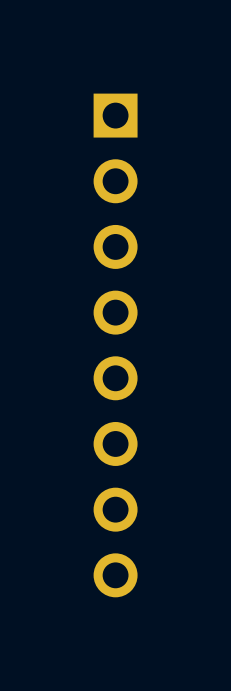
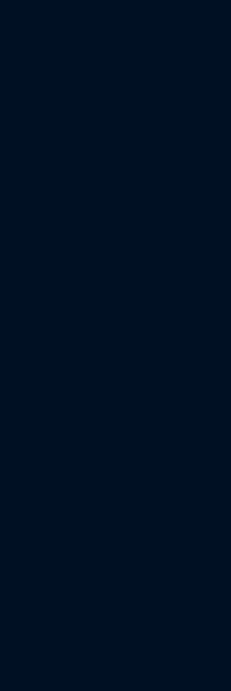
part: (115, 345) -> none

